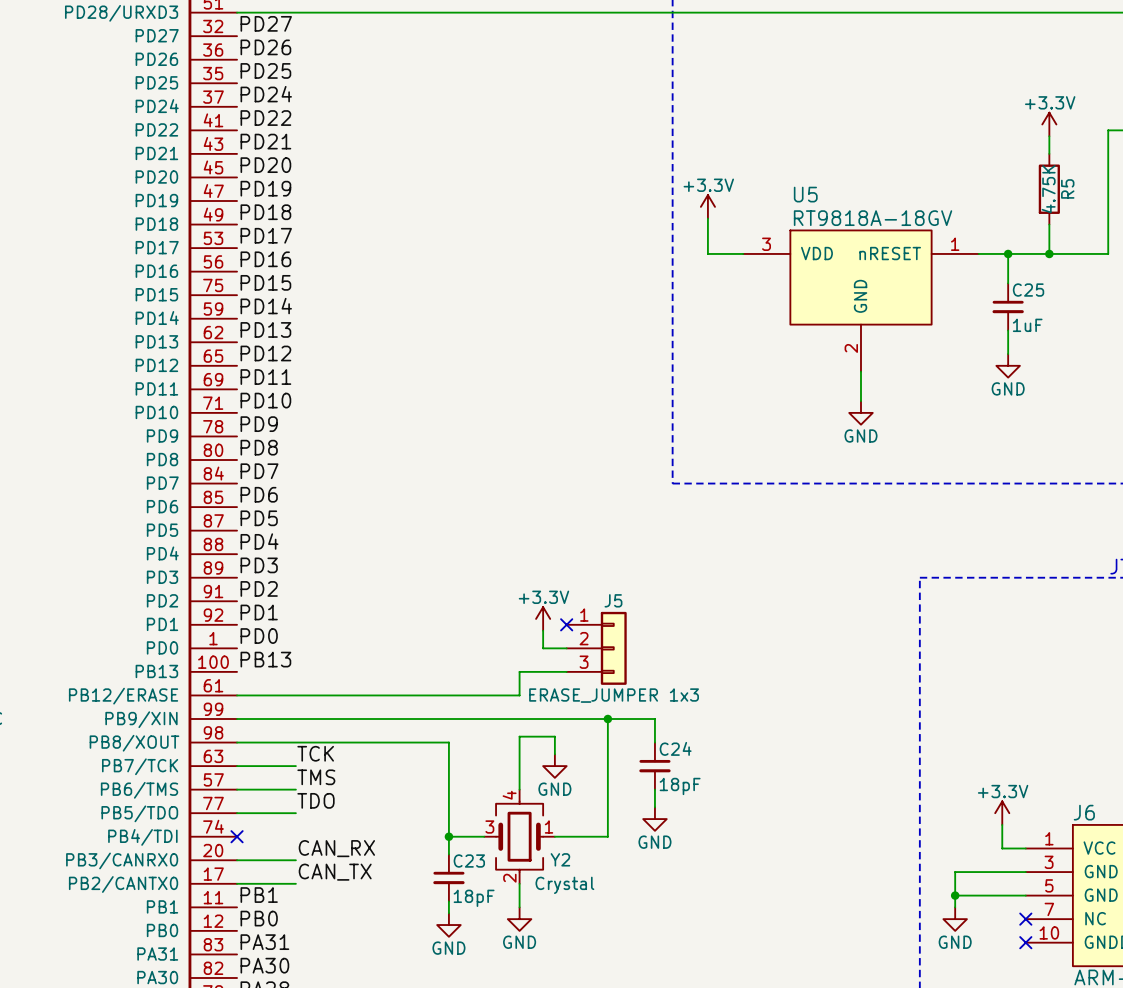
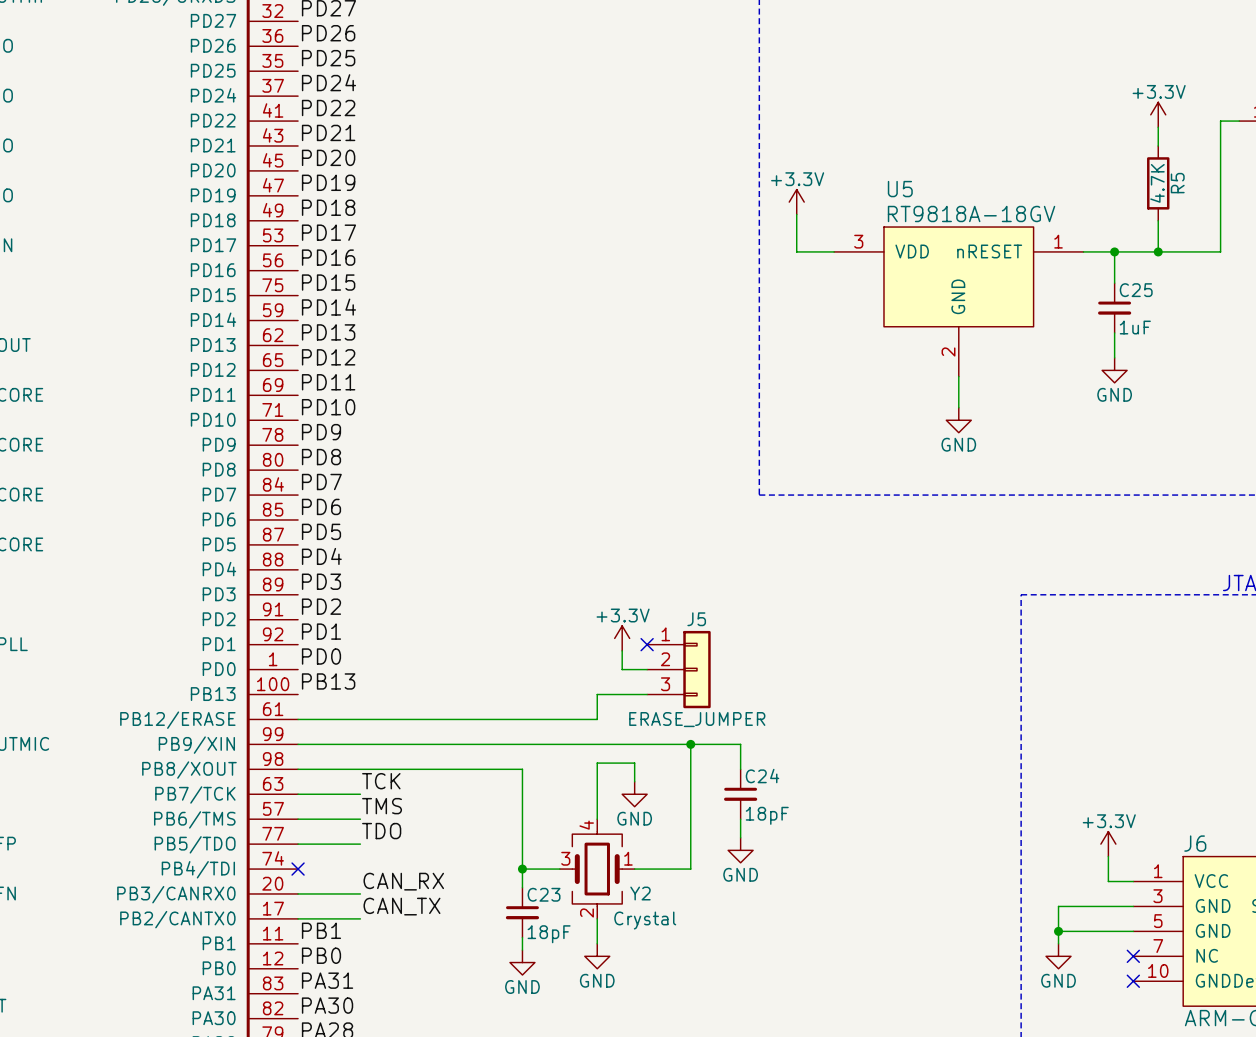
R5 value: 4.75K (1048, 189) -> 4.7K (1157, 183)
J5 value: ERASE_JUMPER 1x3 (614, 695) -> ERASE_JUMPER (697, 719)

